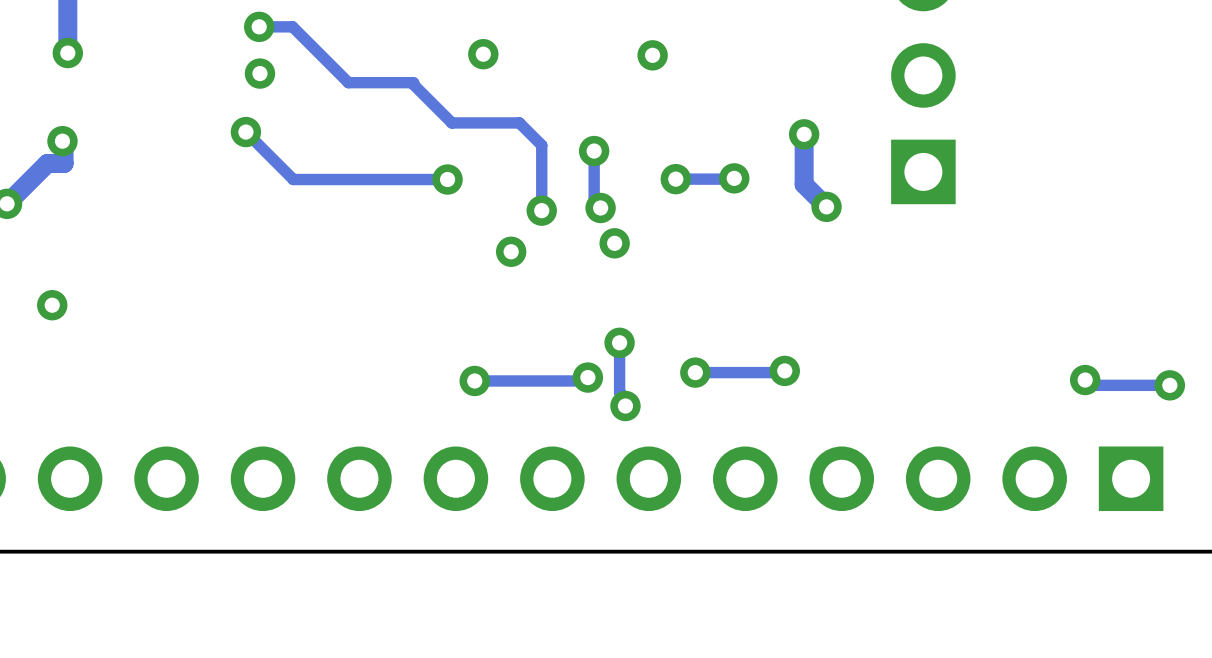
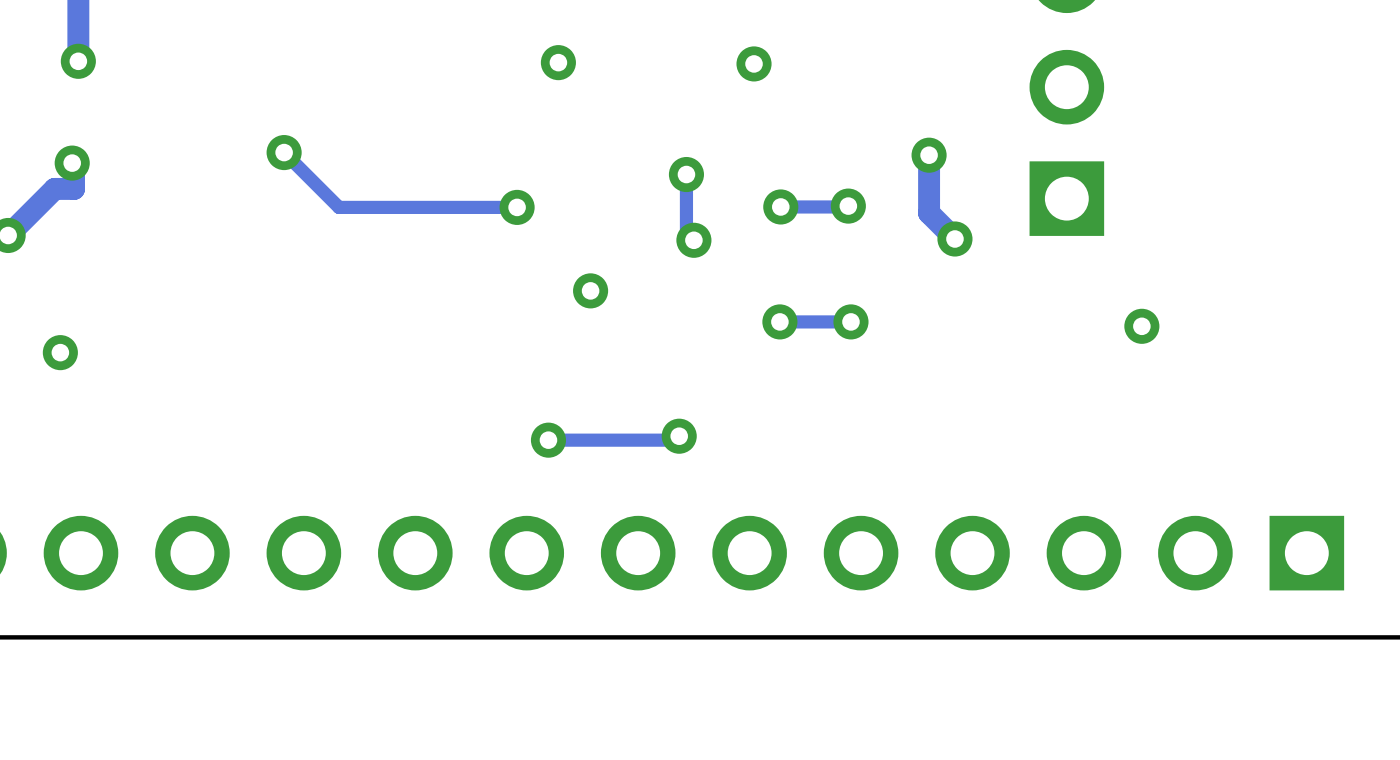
track: (259, 26) (292, 26) (348, 82) (413, 82) -> none
via: (259, 26) -> none
via: (259, 73) -> none
track: (411, 82) (451, 122) (519, 122) (541, 145) (541, 210) -> none
via: (541, 210) -> none
via: (614, 243) -> none
via: none -> (779, 321)
track: none -> (850, 321) (779, 321)
via: none -> (850, 321)
via: none -> (1141, 326)
track: (619, 342) (619, 392) (626, 398) (625, 406) -> none
via: (619, 342) -> none
track: (784, 370) (783, 372) (695, 372) -> none
via: (784, 370) -> none
via: (695, 372) -> none
track: (1085, 380) (1090, 385) (1169, 385) -> none
via: (1085, 380) -> none
via: (1169, 385) -> none
via: (625, 406) -> none

